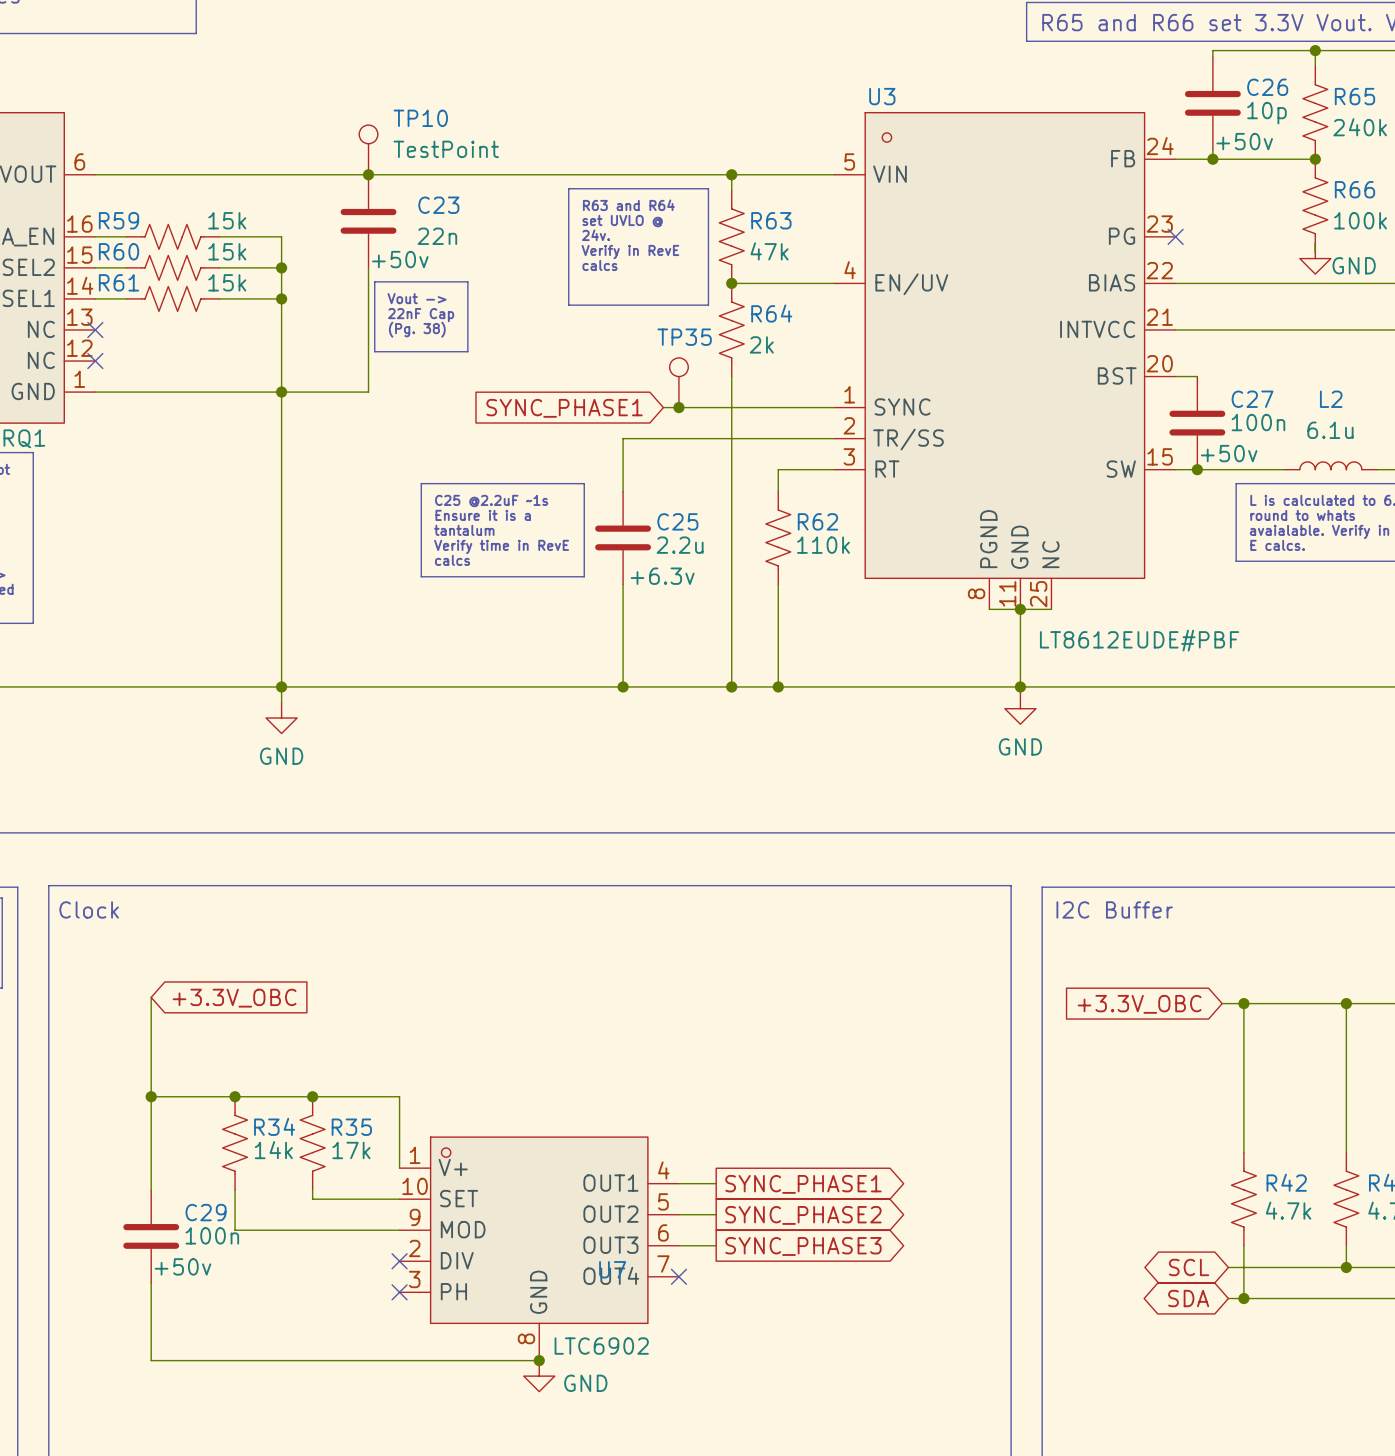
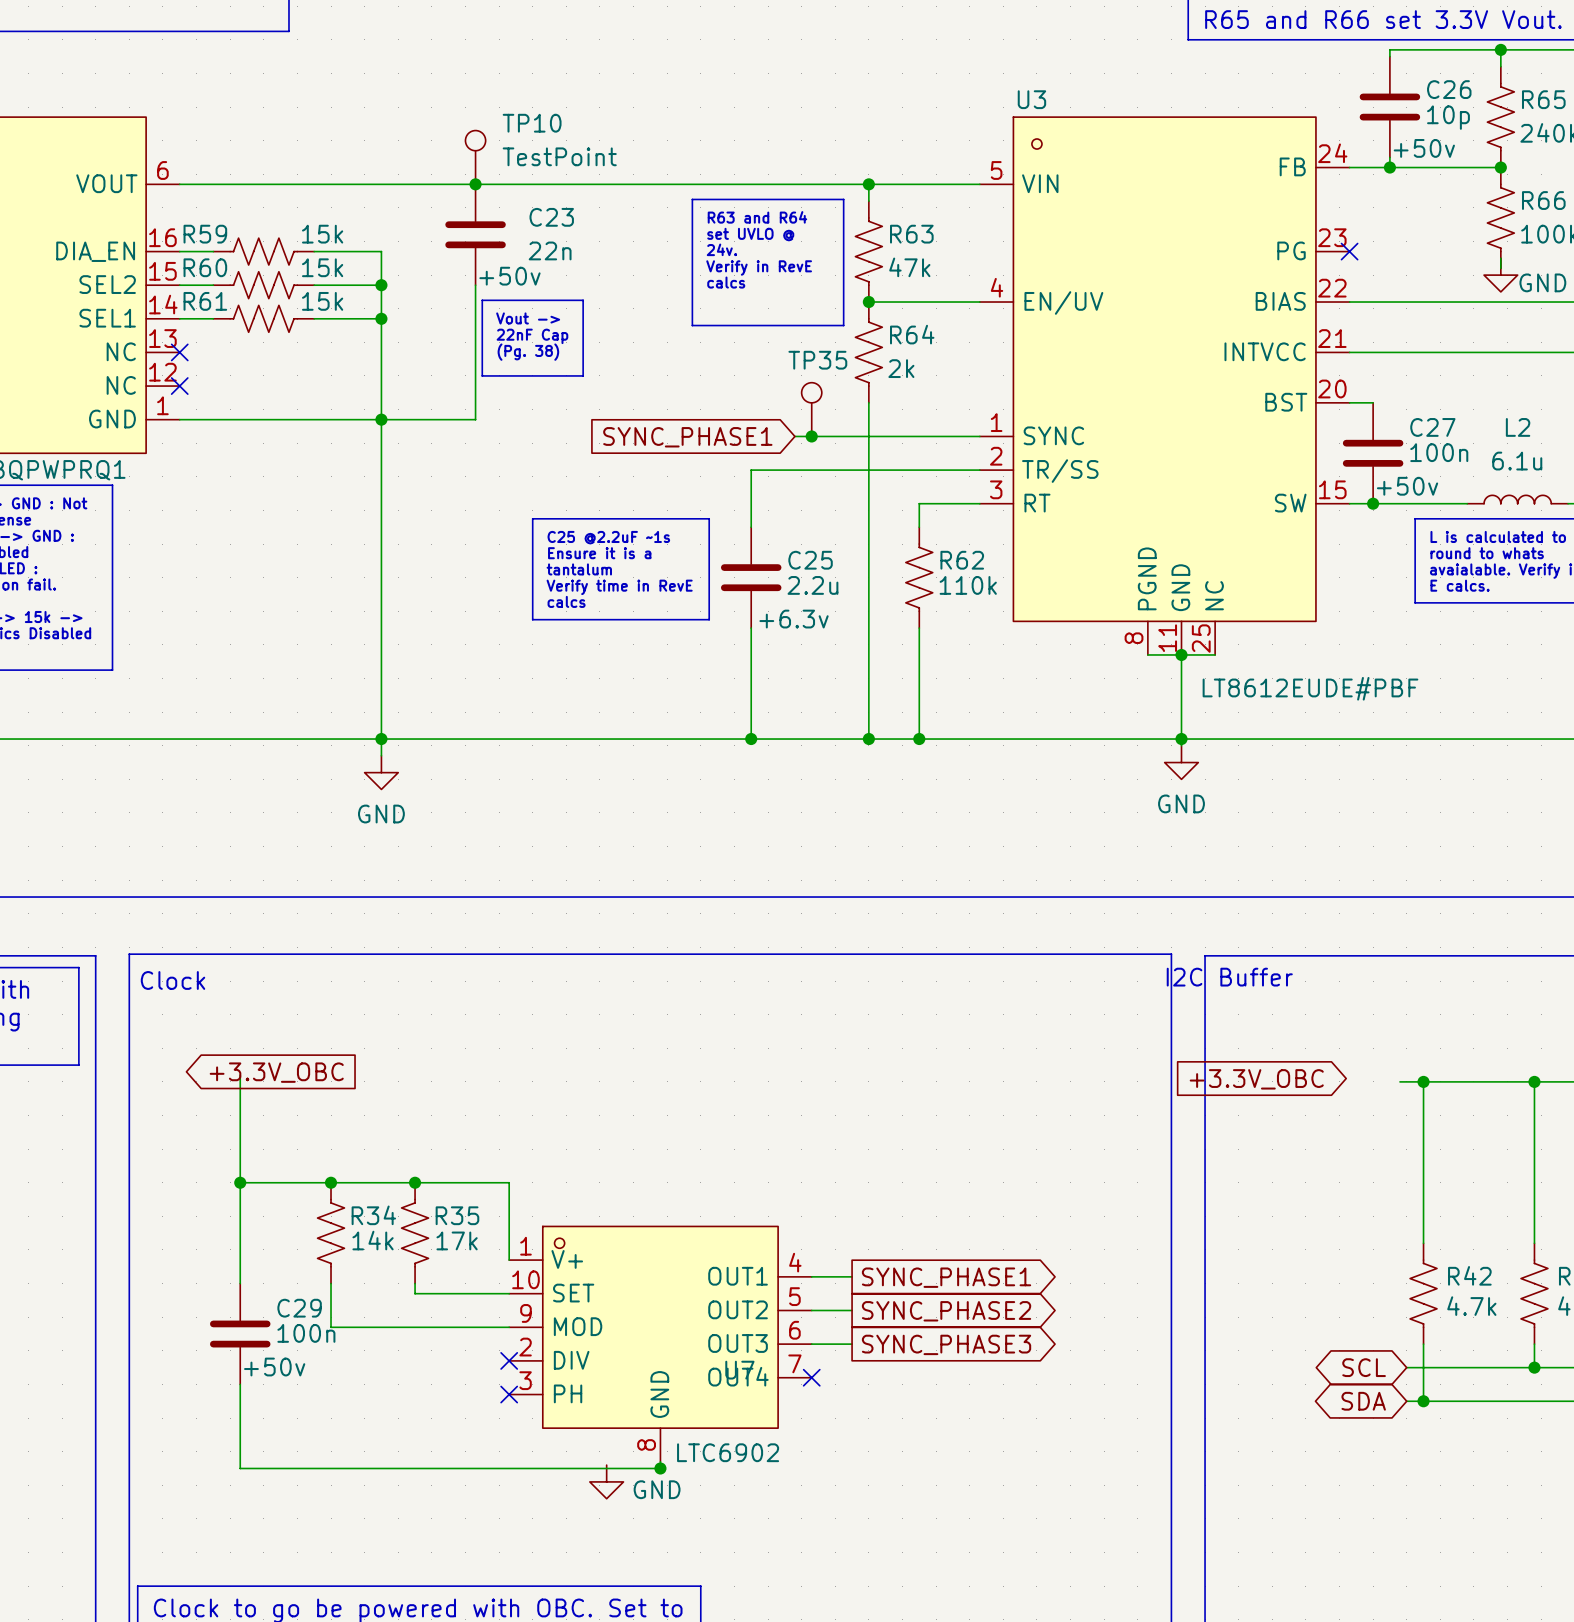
text position: I2C Buffer (1114, 909) -> I2C Buffer (1229, 977)
global label position: +3.3V_OBC (234, 998) -> +3.3V_OBC (276, 1072)
global label position: +3.3V_OBC (1139, 1004) -> +3.3V_OBC (1256, 1079)
power symbol position: GND (539, 1376) -> GND (606, 1481)

